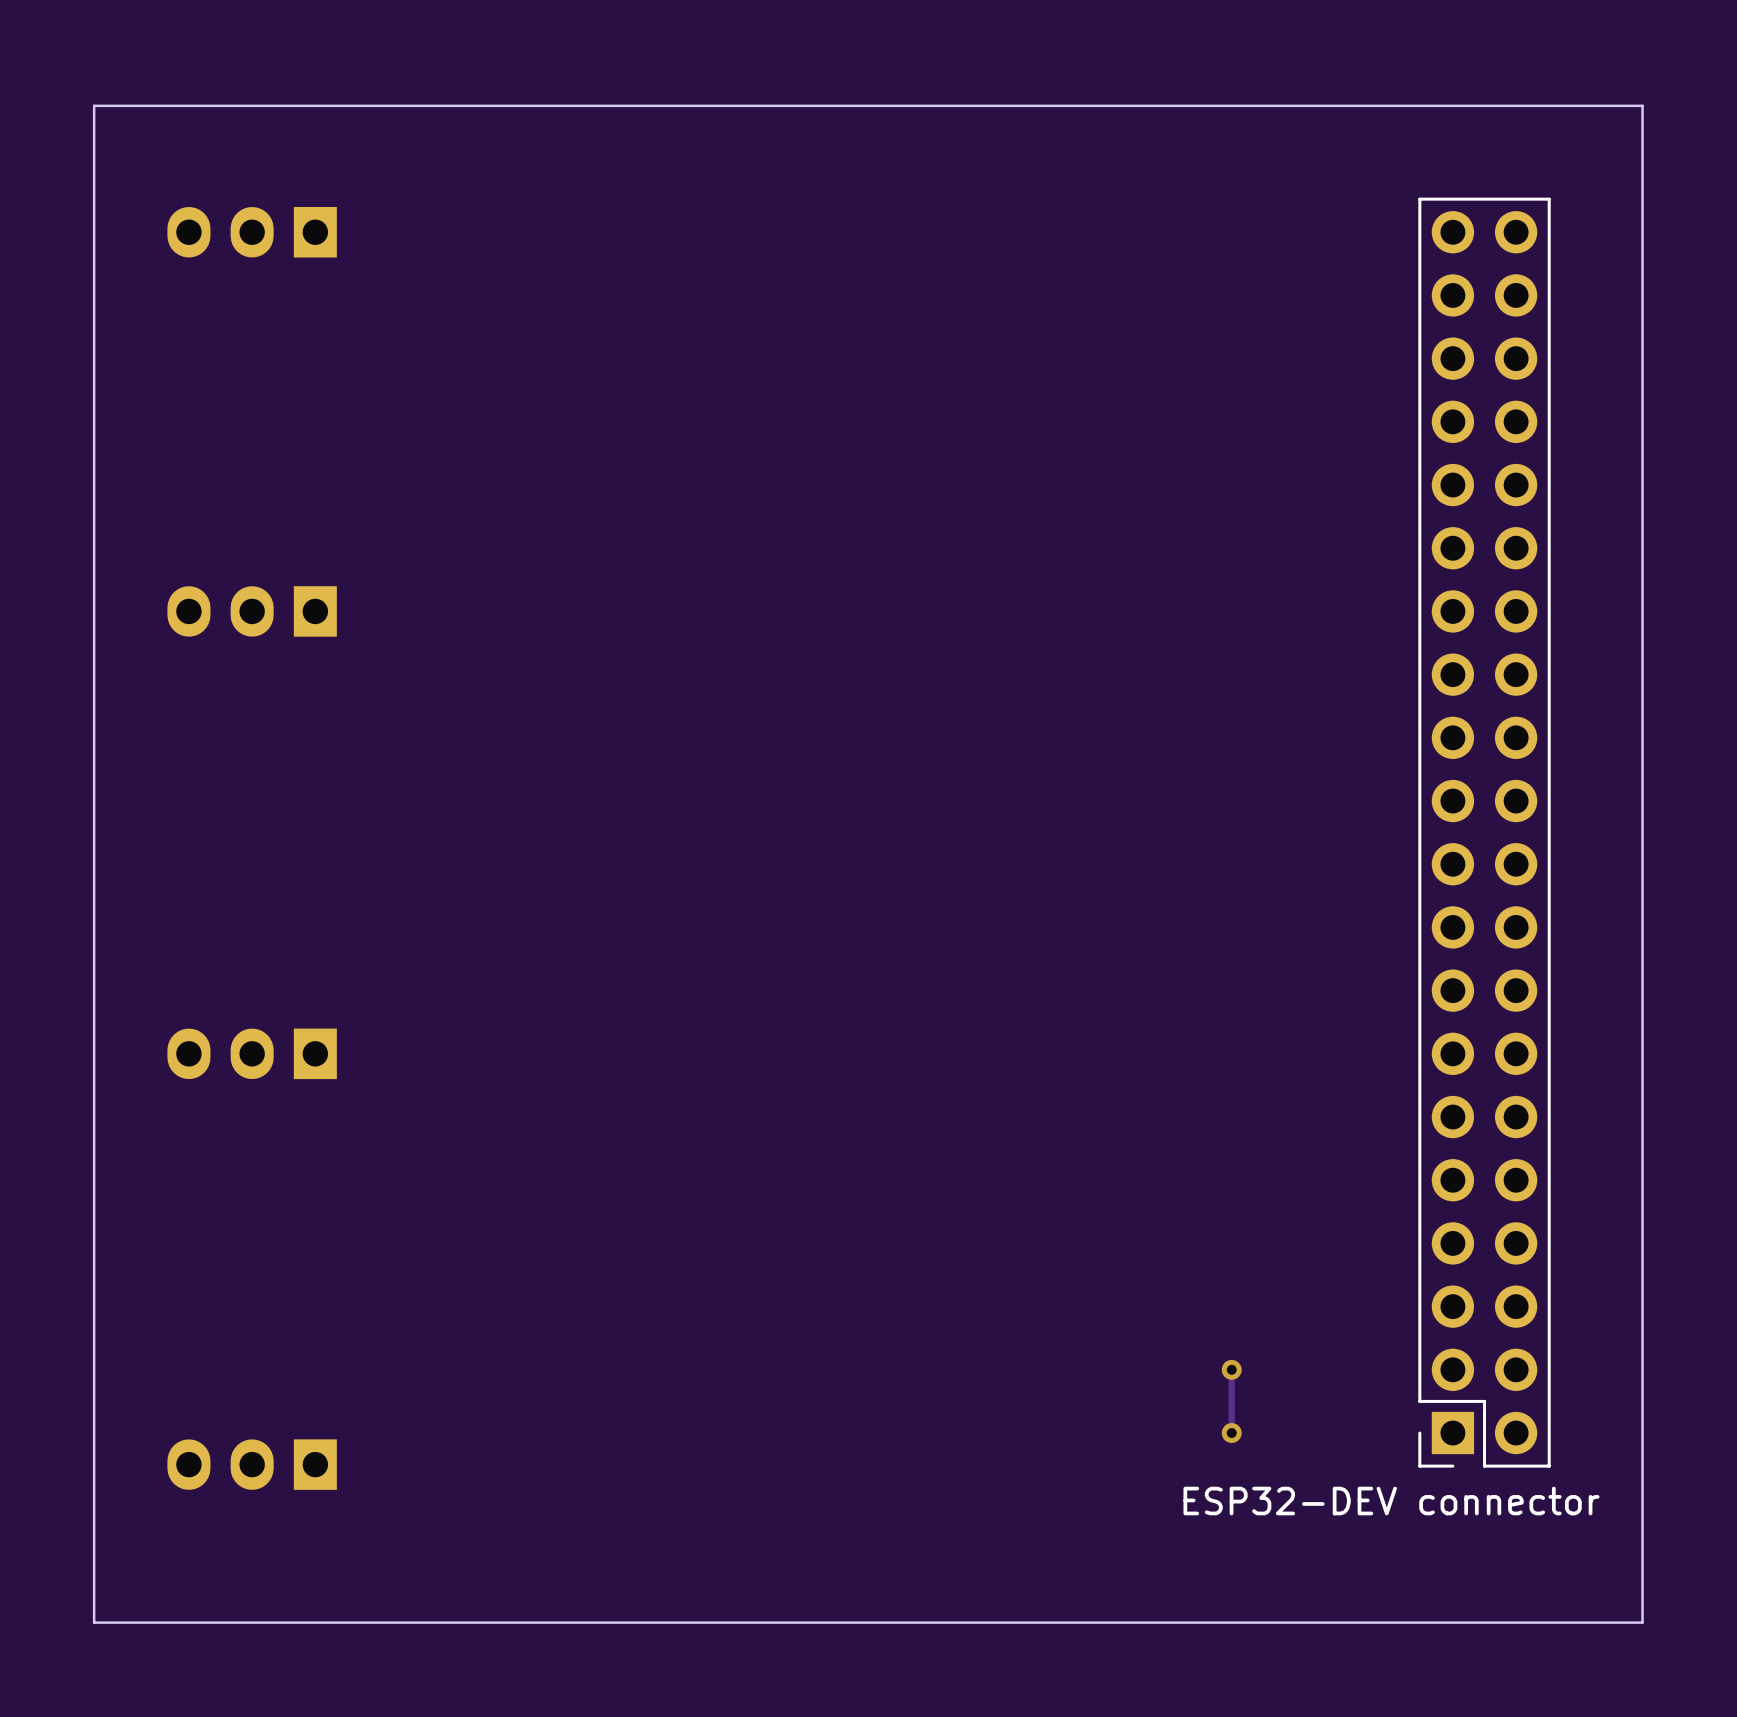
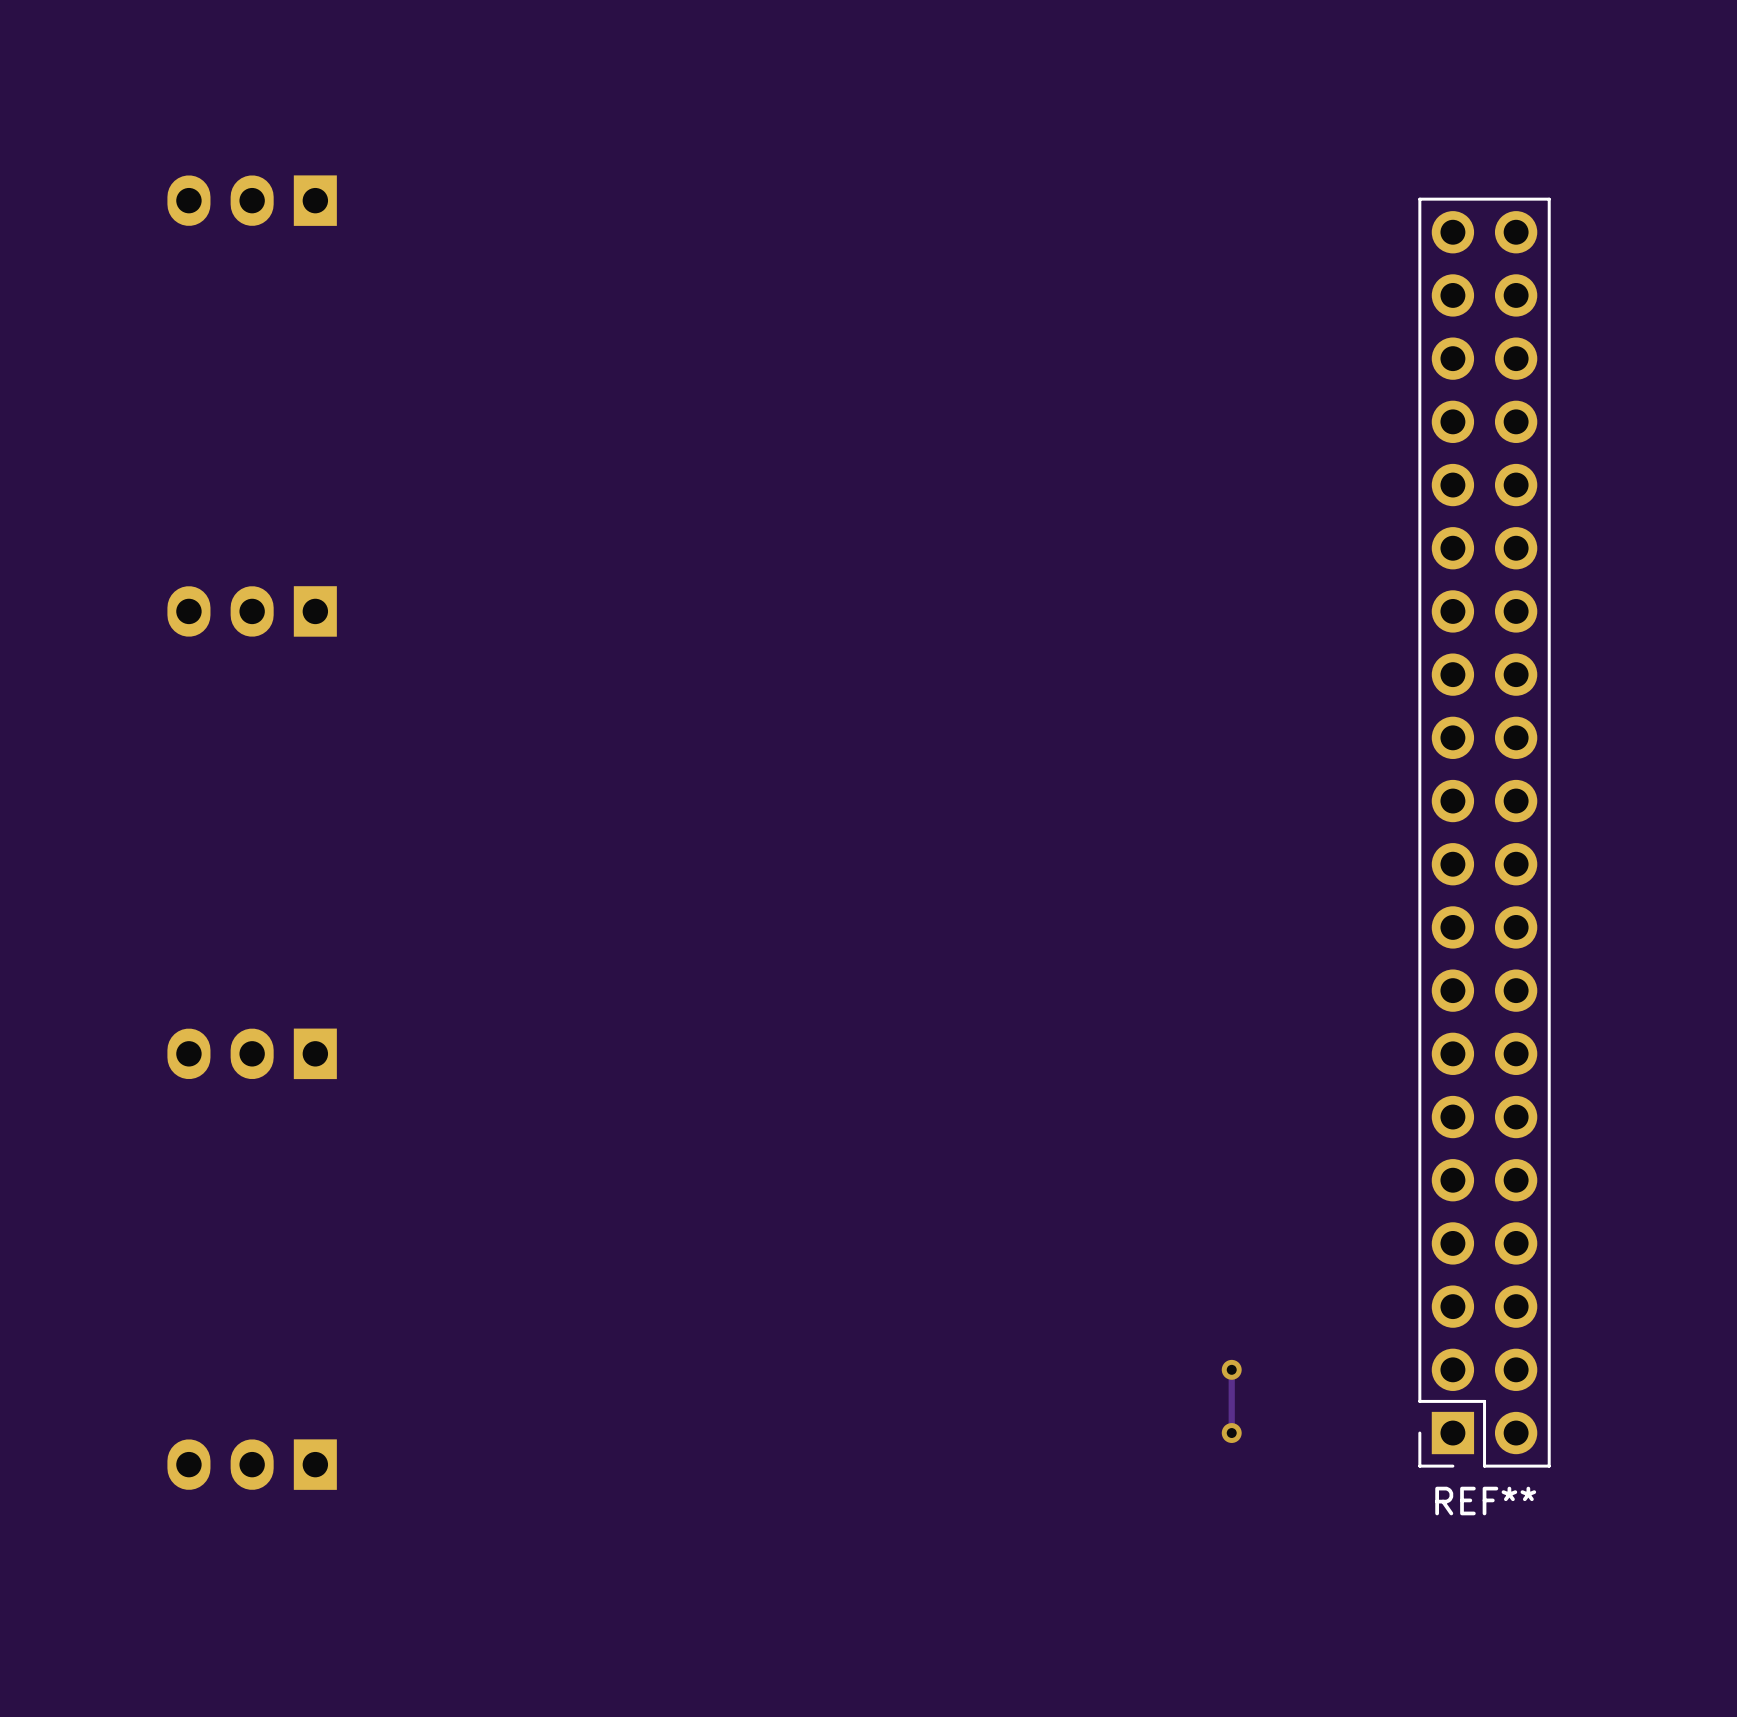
board edge: (1642, 105) (94, 105) (94, 1622) (1642, 1622) (1642, 105) -> none
part position: (252, 232) -> (252, 200)
ESP32-DEV connector name: ESP32-DEV connector (1391, 1501) -> REF** (1485, 1501)

